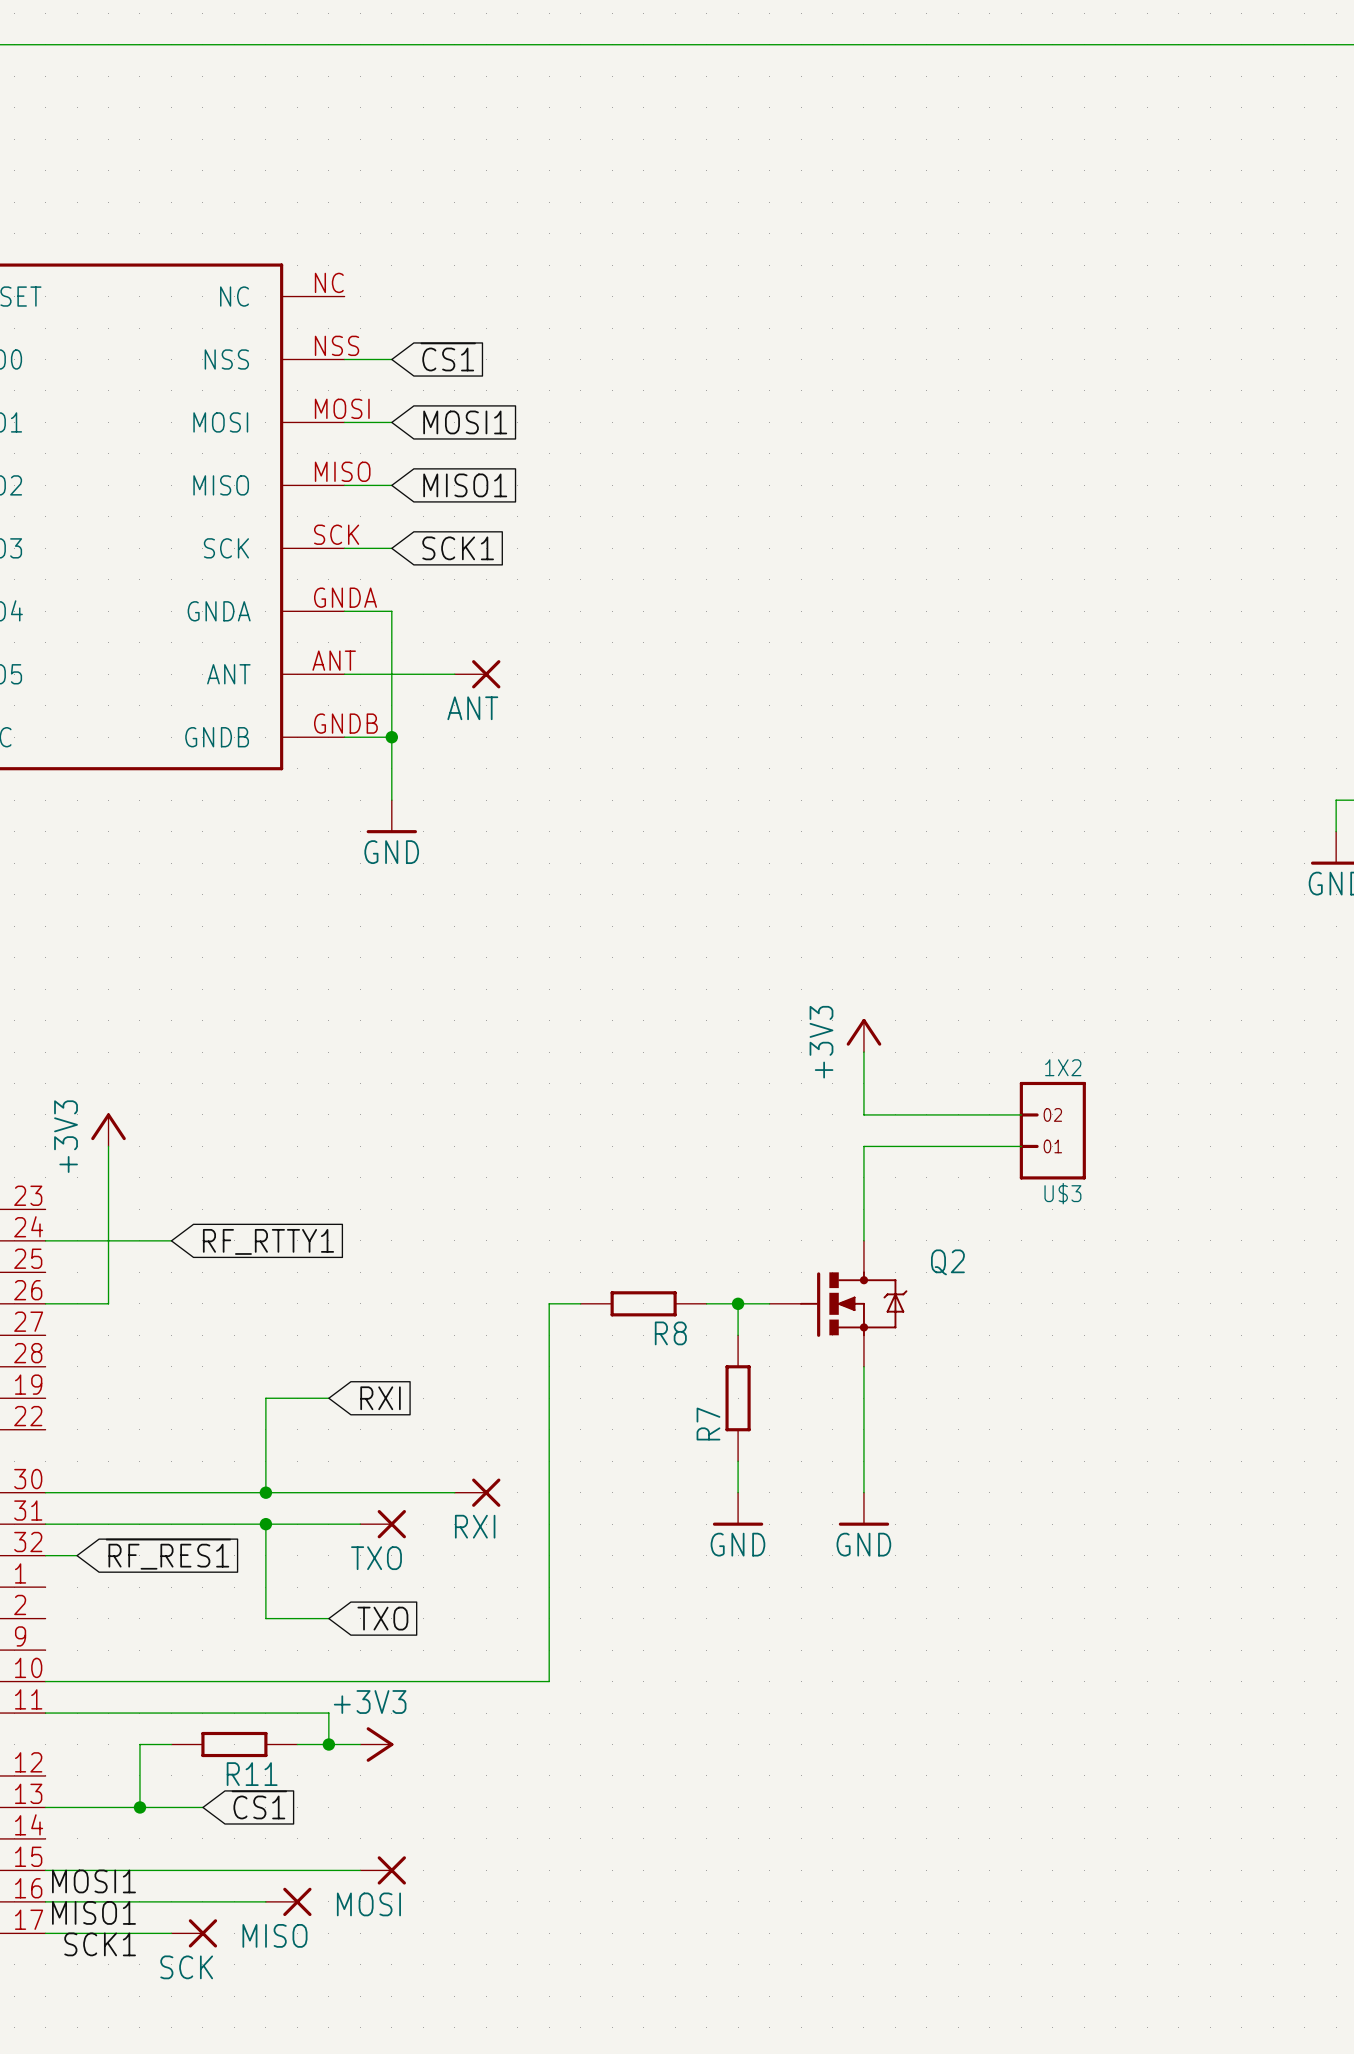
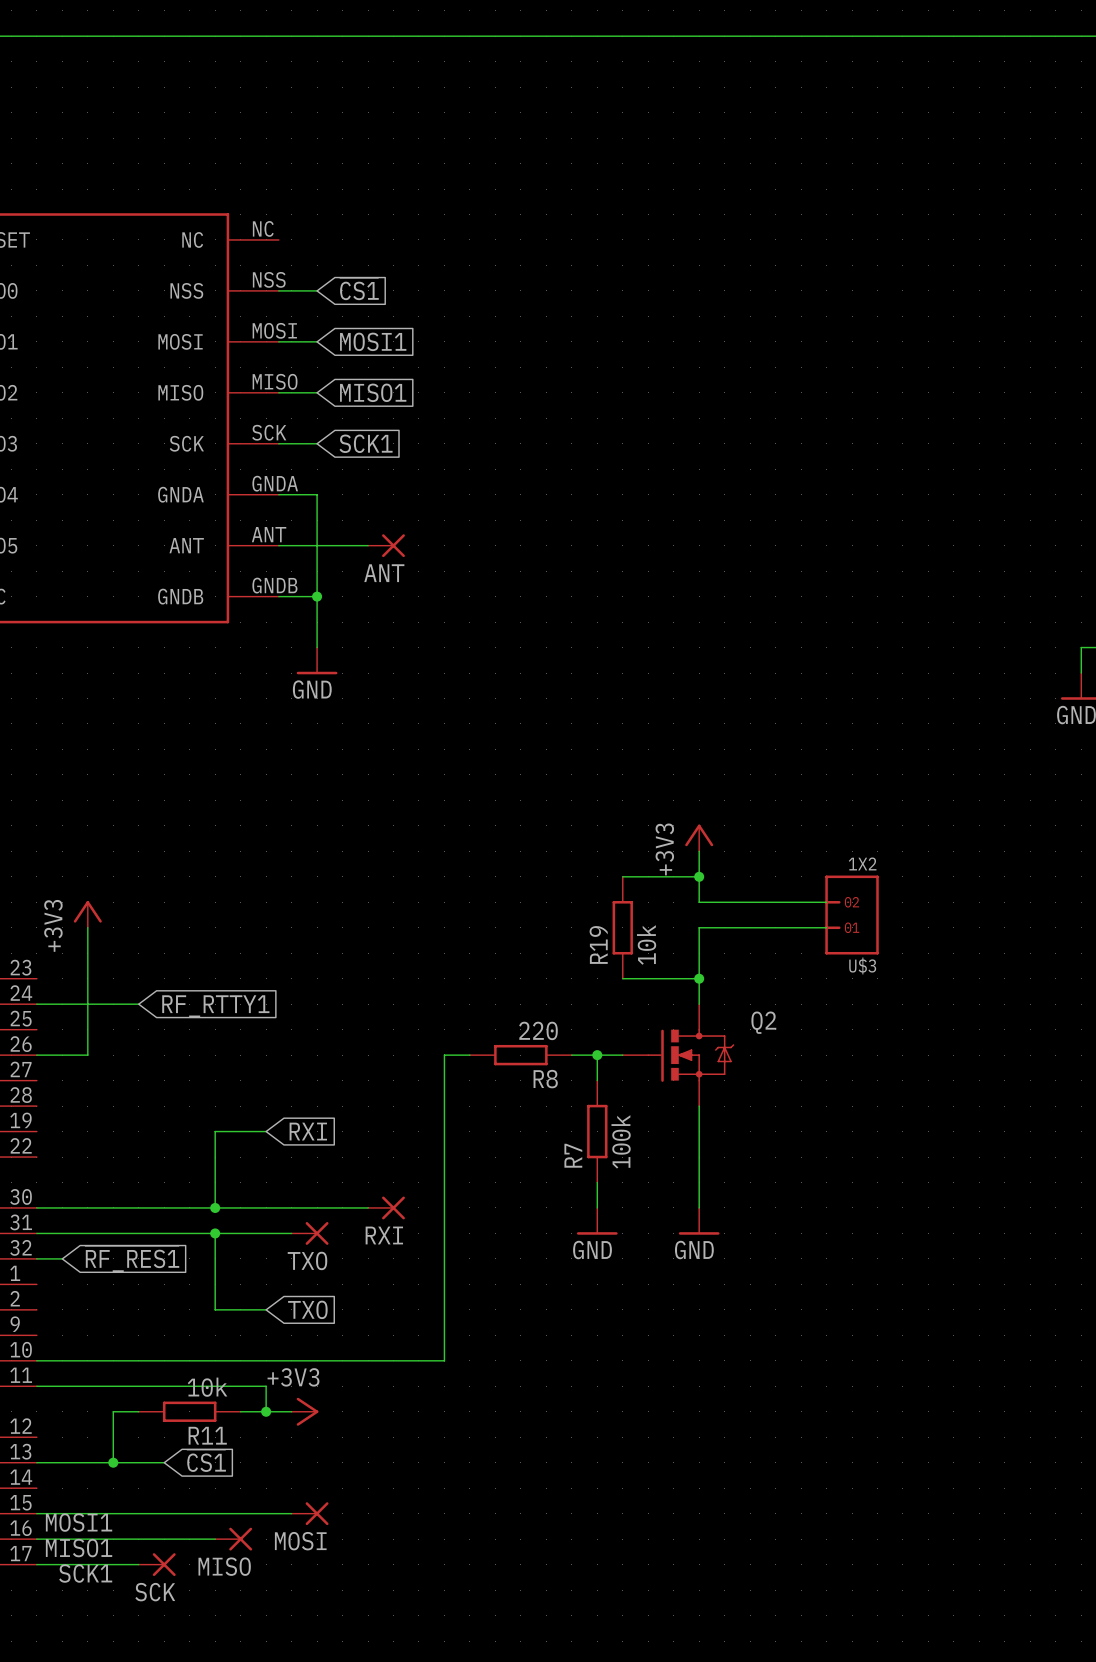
wire: none -> (622, 876) (699, 876)
junction: none -> (699, 876)
R19: none -> 10k (622, 927)
wire: none -> (622, 978) (699, 978)
junction: none -> (699, 978)
R8 value: none -> 220 (538, 1030)
R7 value: none -> 100k (621, 1141)
R11 value: none -> 10k (207, 1387)

